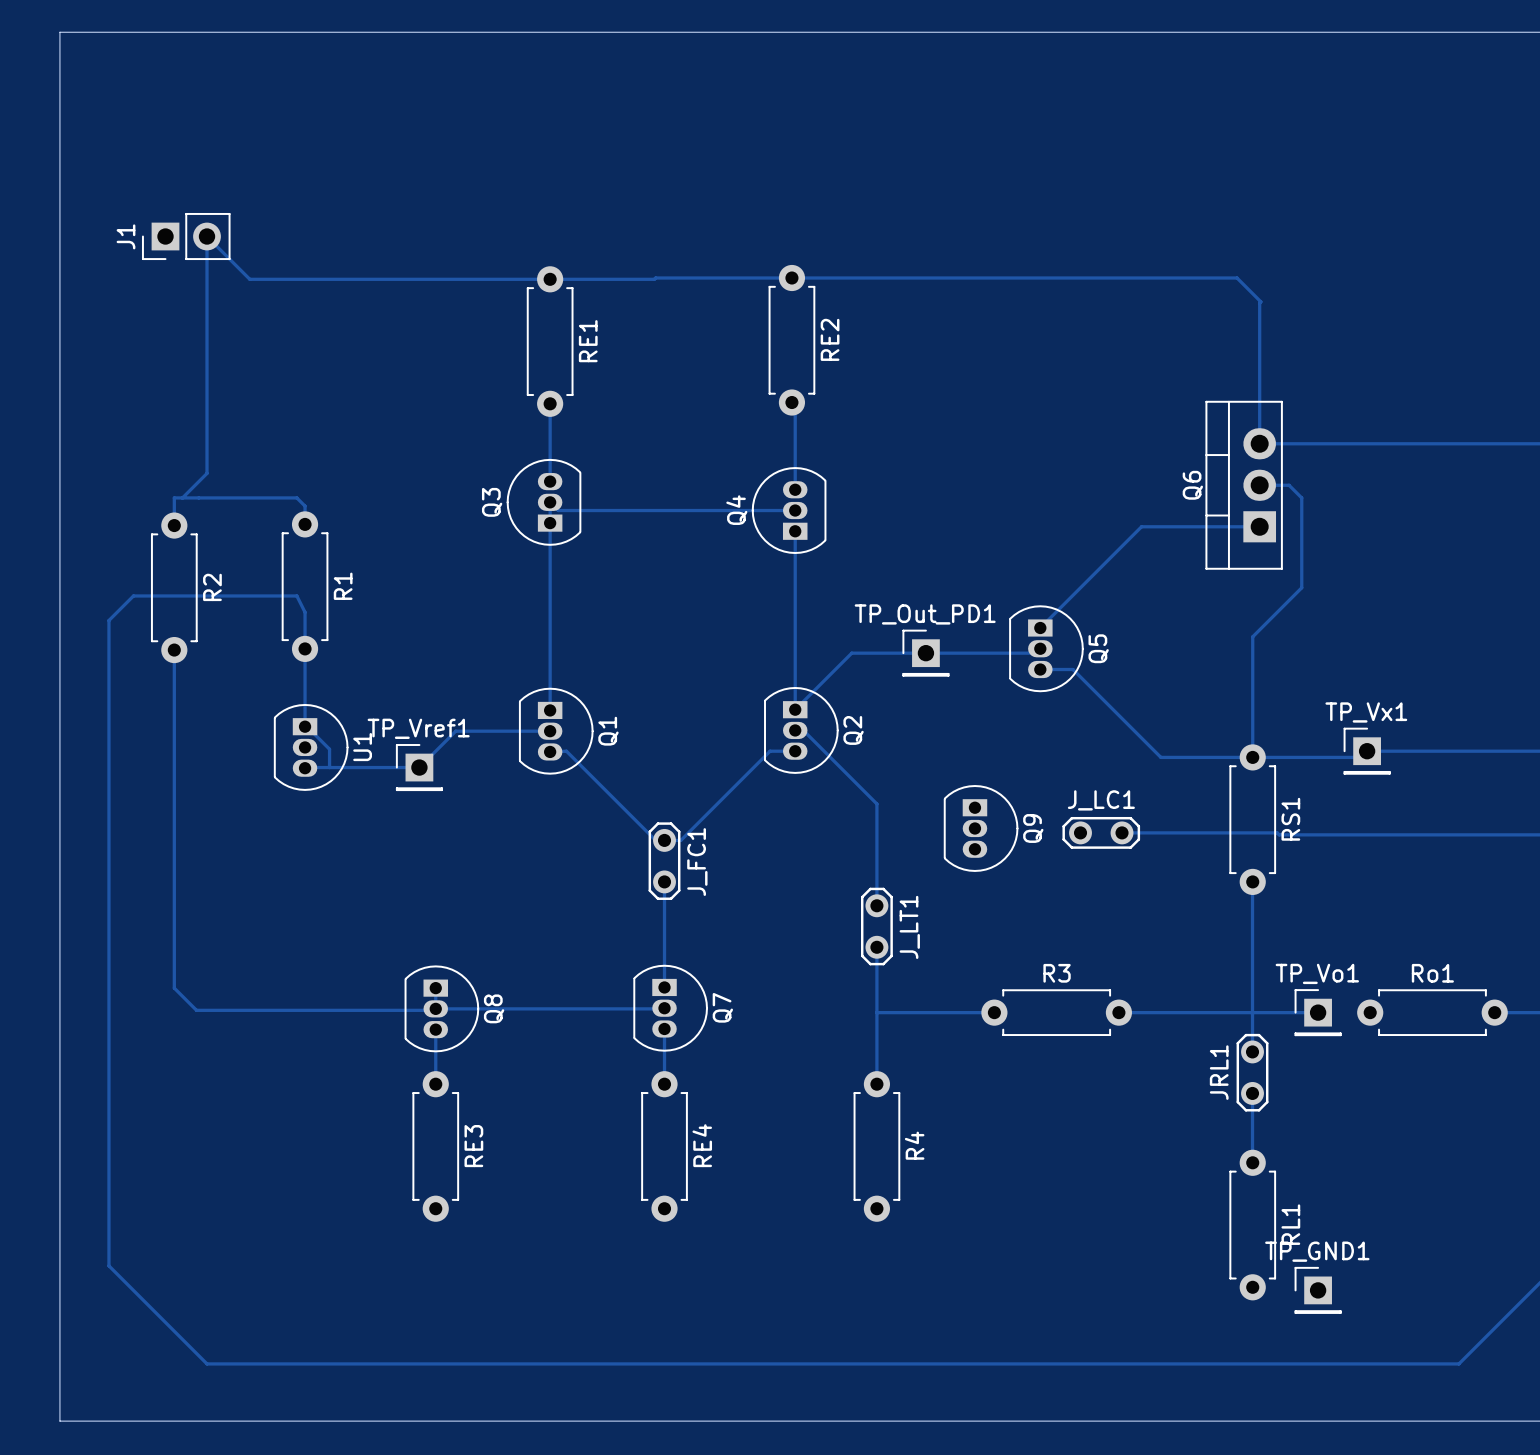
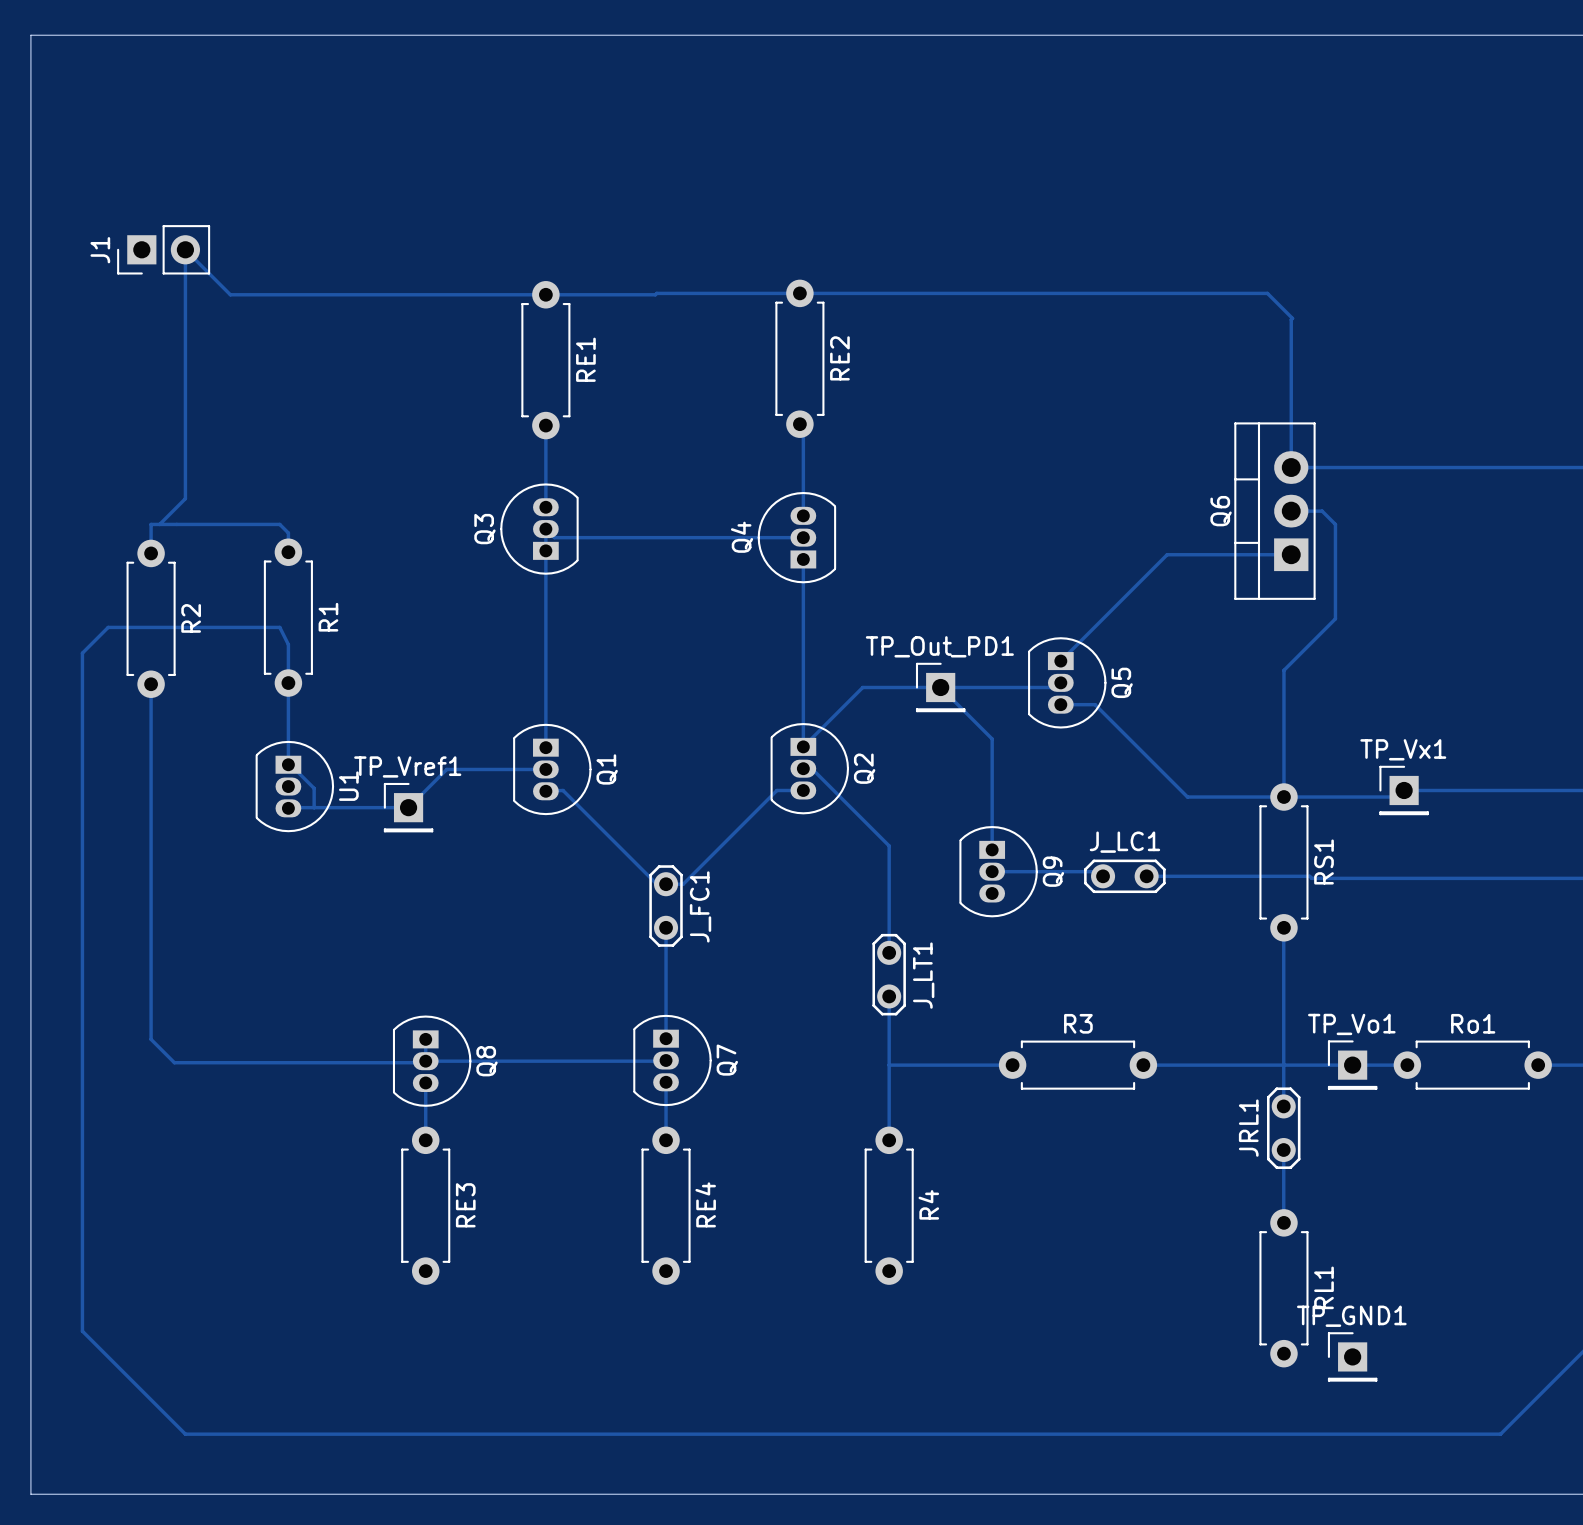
track: none -> (940, 687) (992, 738) (992, 849)
track: none -> (992, 871) (1098, 871) (1103, 876)
track: none -> (1352, 1065) (1407, 1065)

